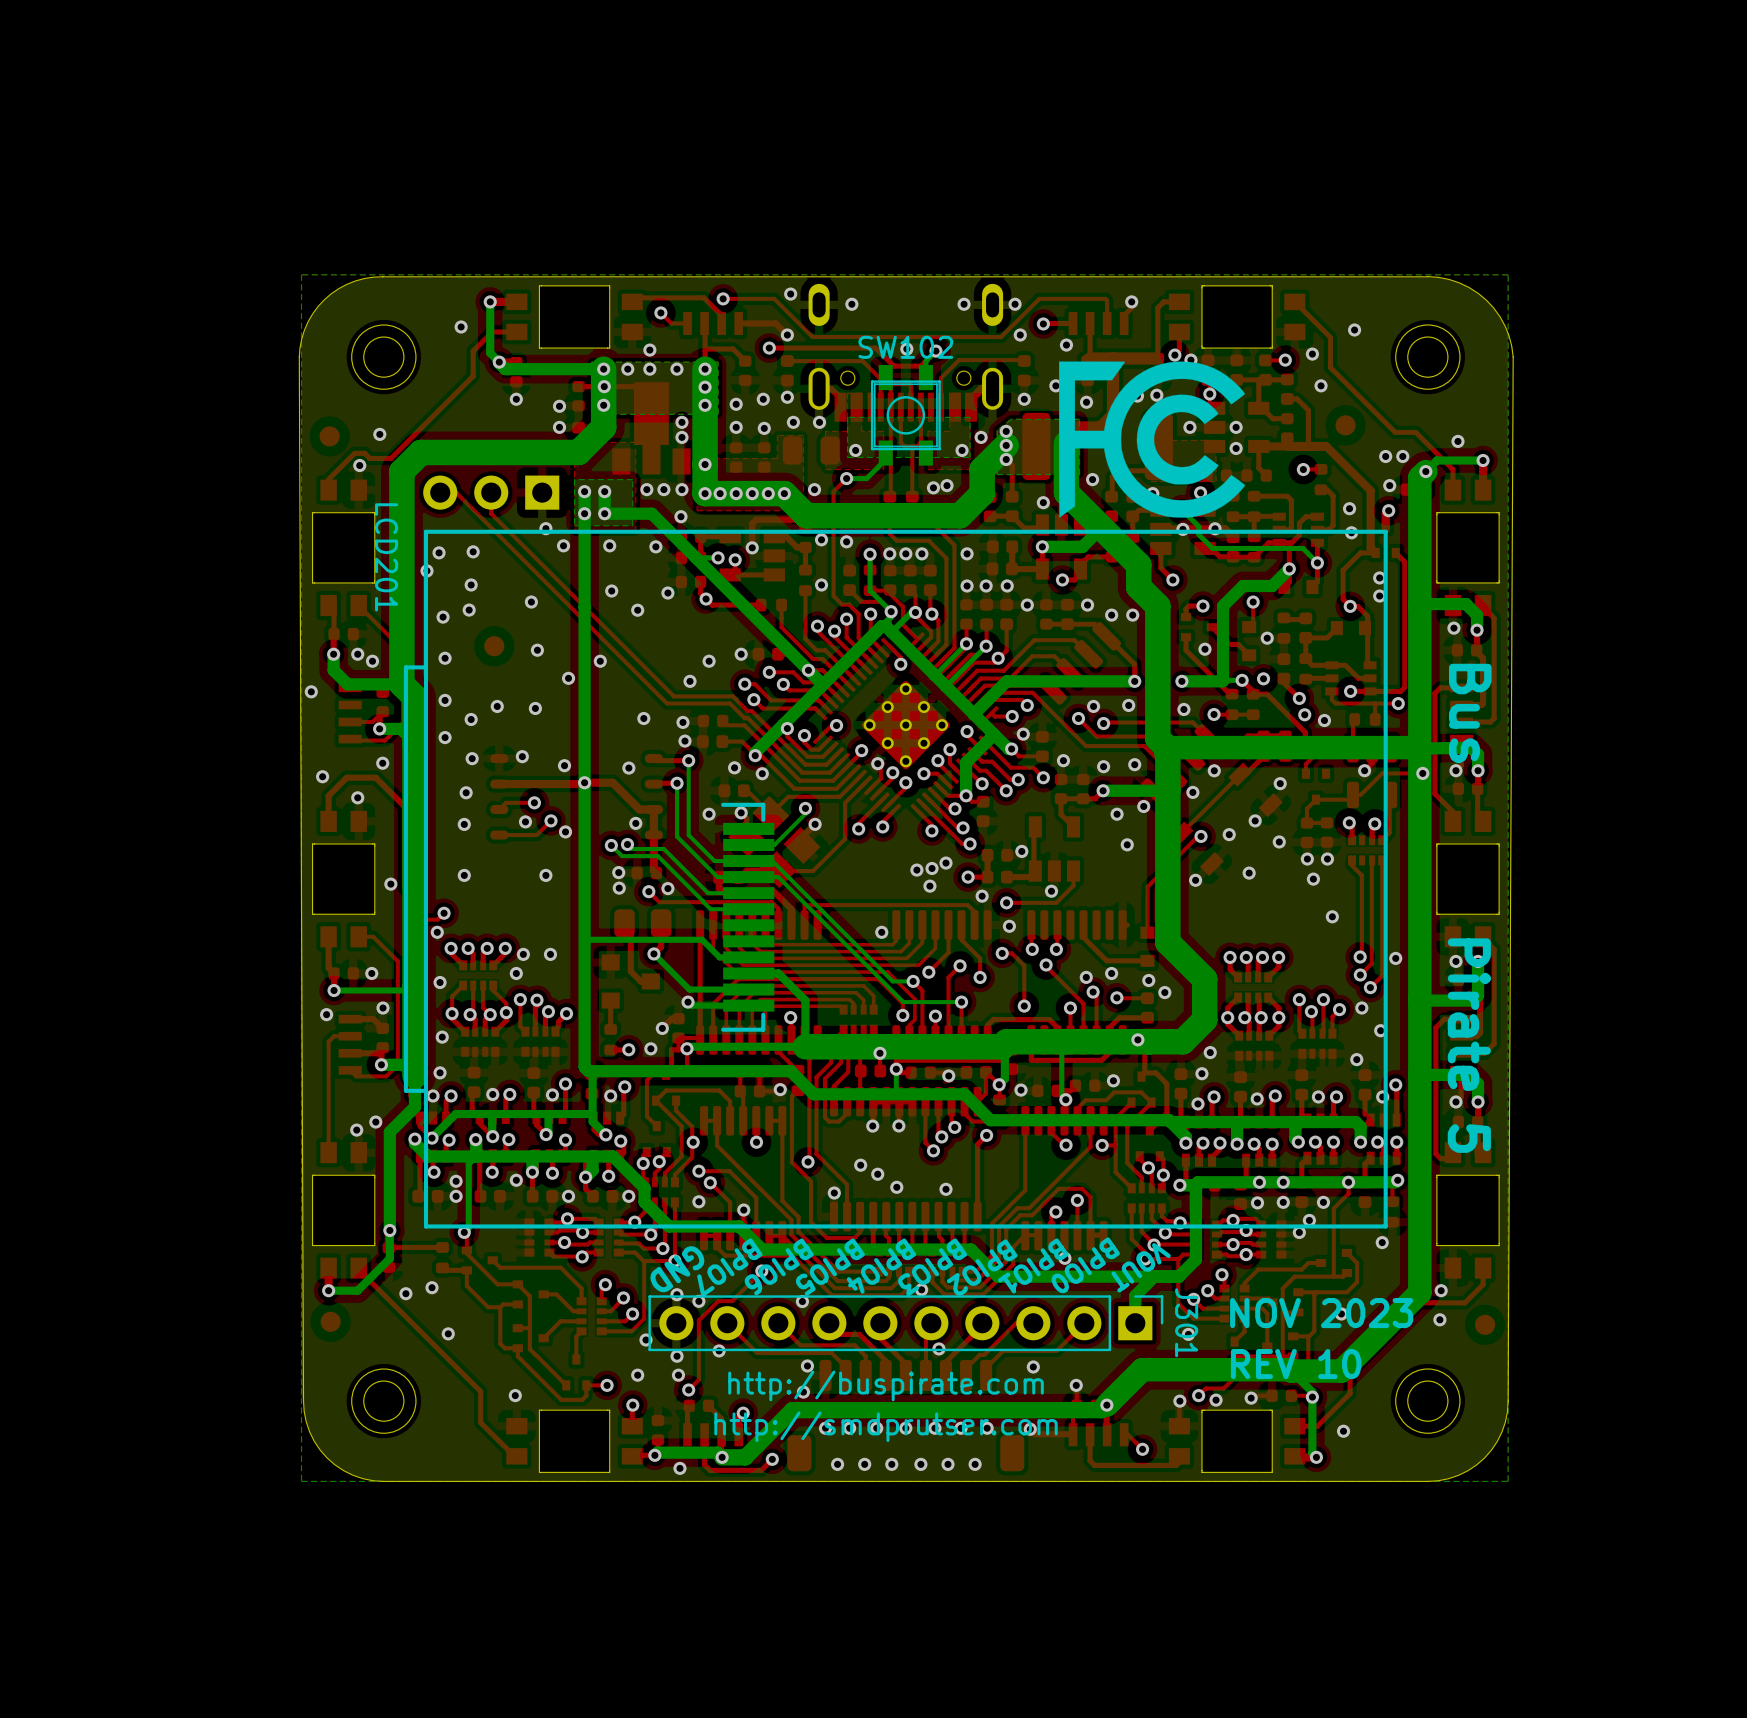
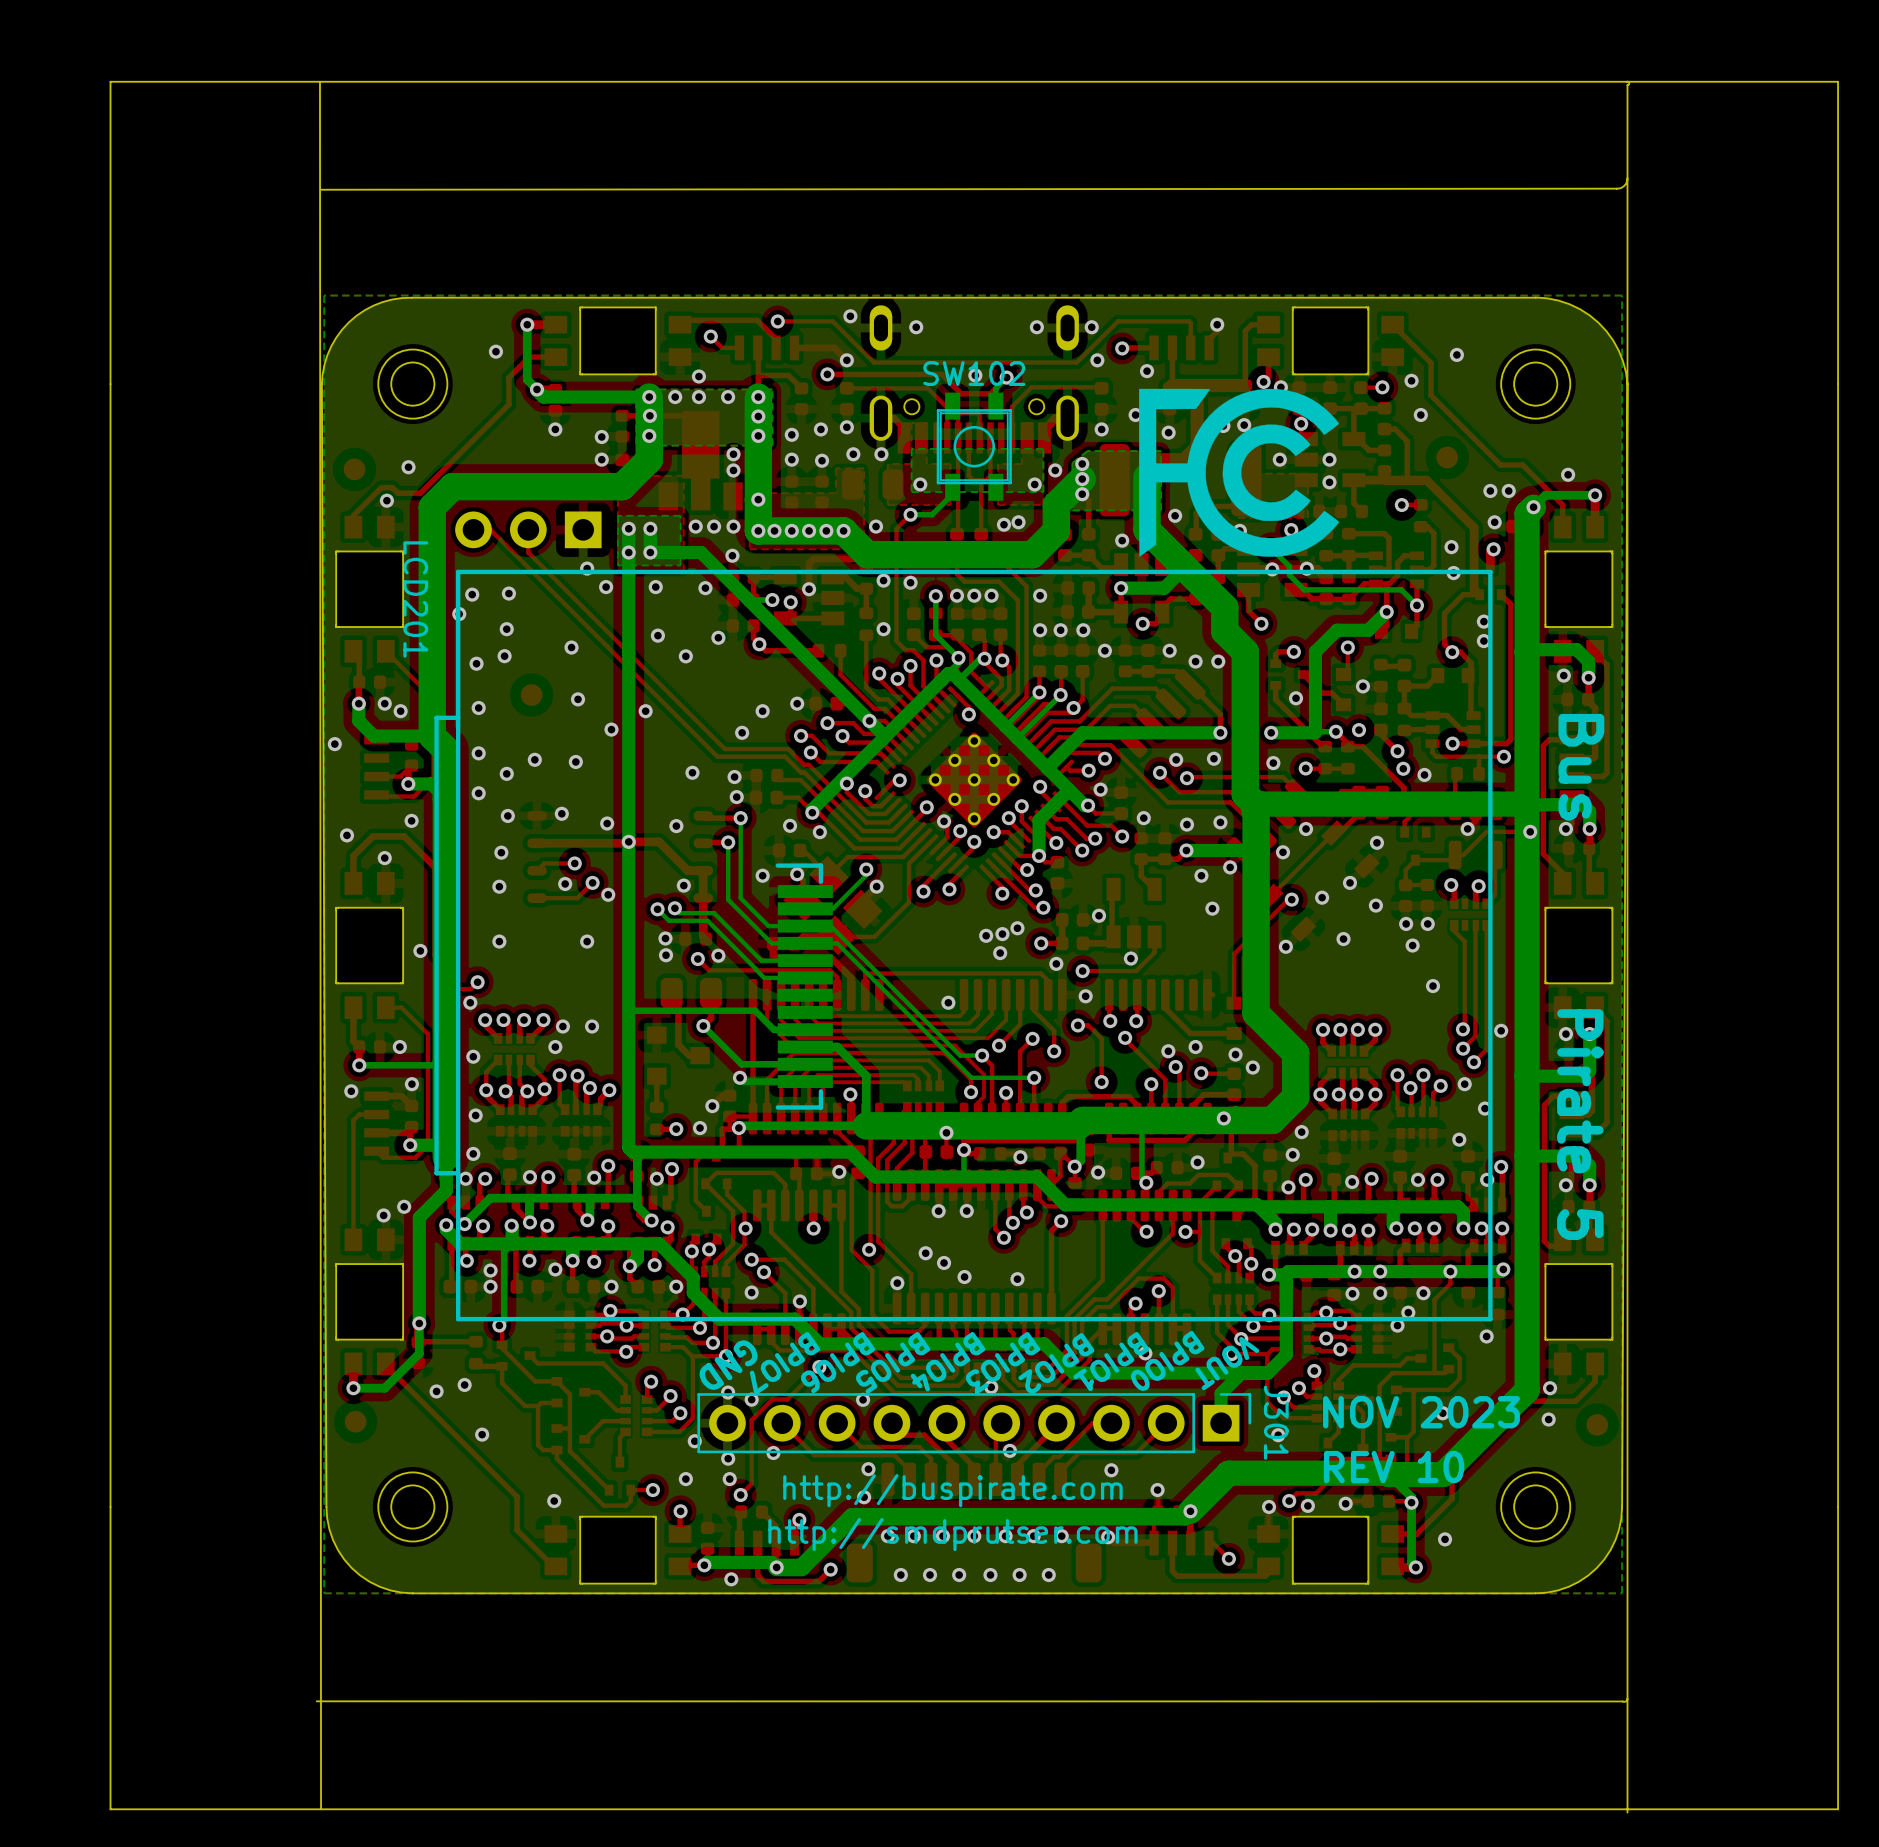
board edge: none -> (319, 81) (321, 1809)
board edge: none -> (1626, 81) (1629, 83) (1627, 85)
board edge: none -> (1838, 81) (110, 81) (110, 1809) (1838, 1809) (1838, 81)
board edge: none -> (1627, 85) (1627, 1812)
board edge: none -> (1627, 178) (1624, 185) (1617, 188) (321, 189)
board edge: none -> (1627, 1698) (1624, 1701) (316, 1701)

